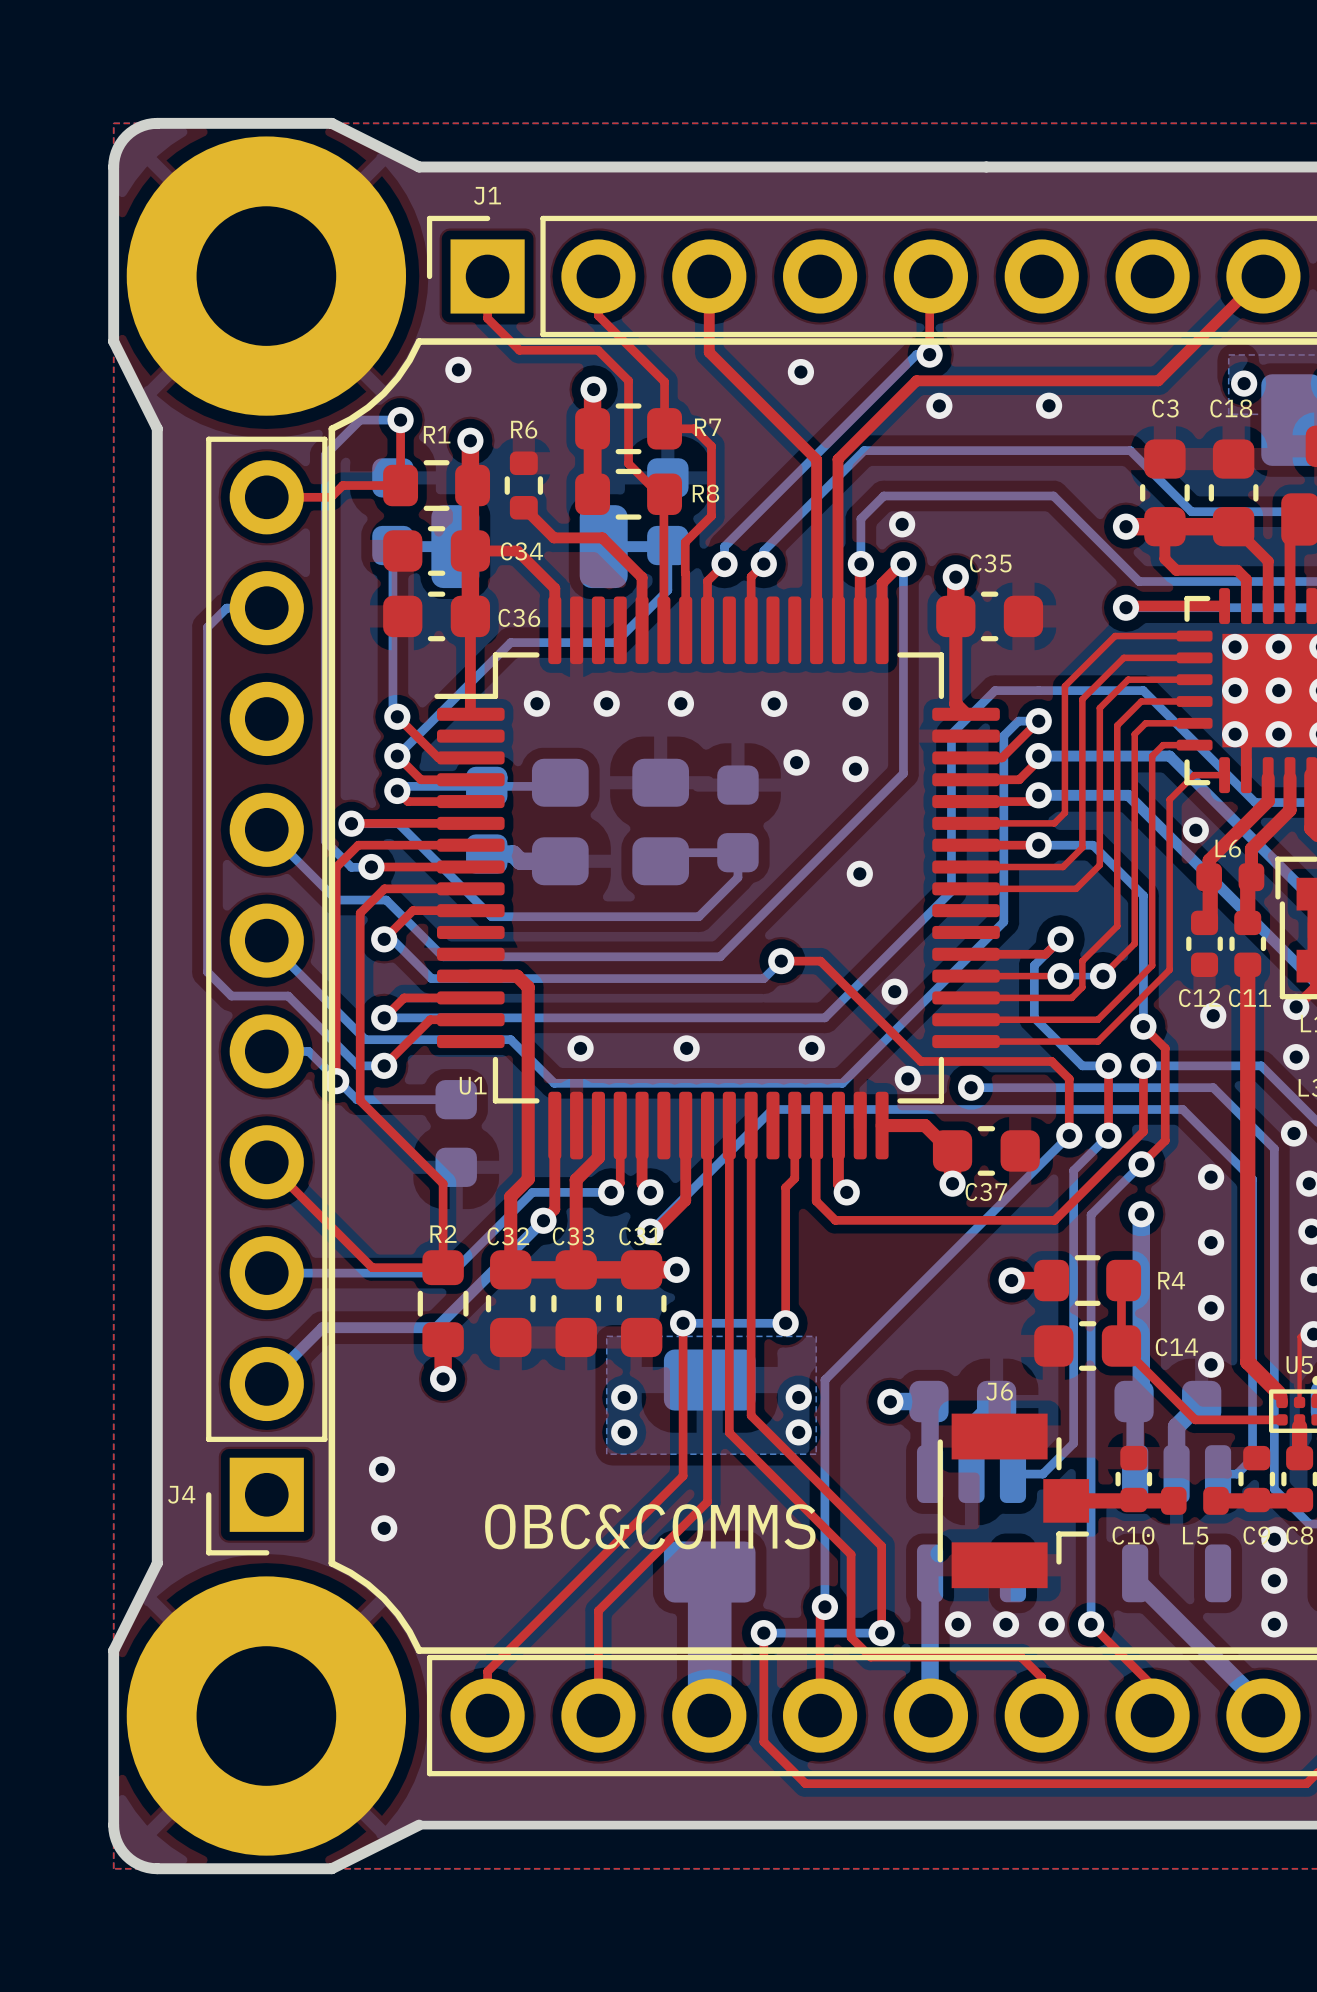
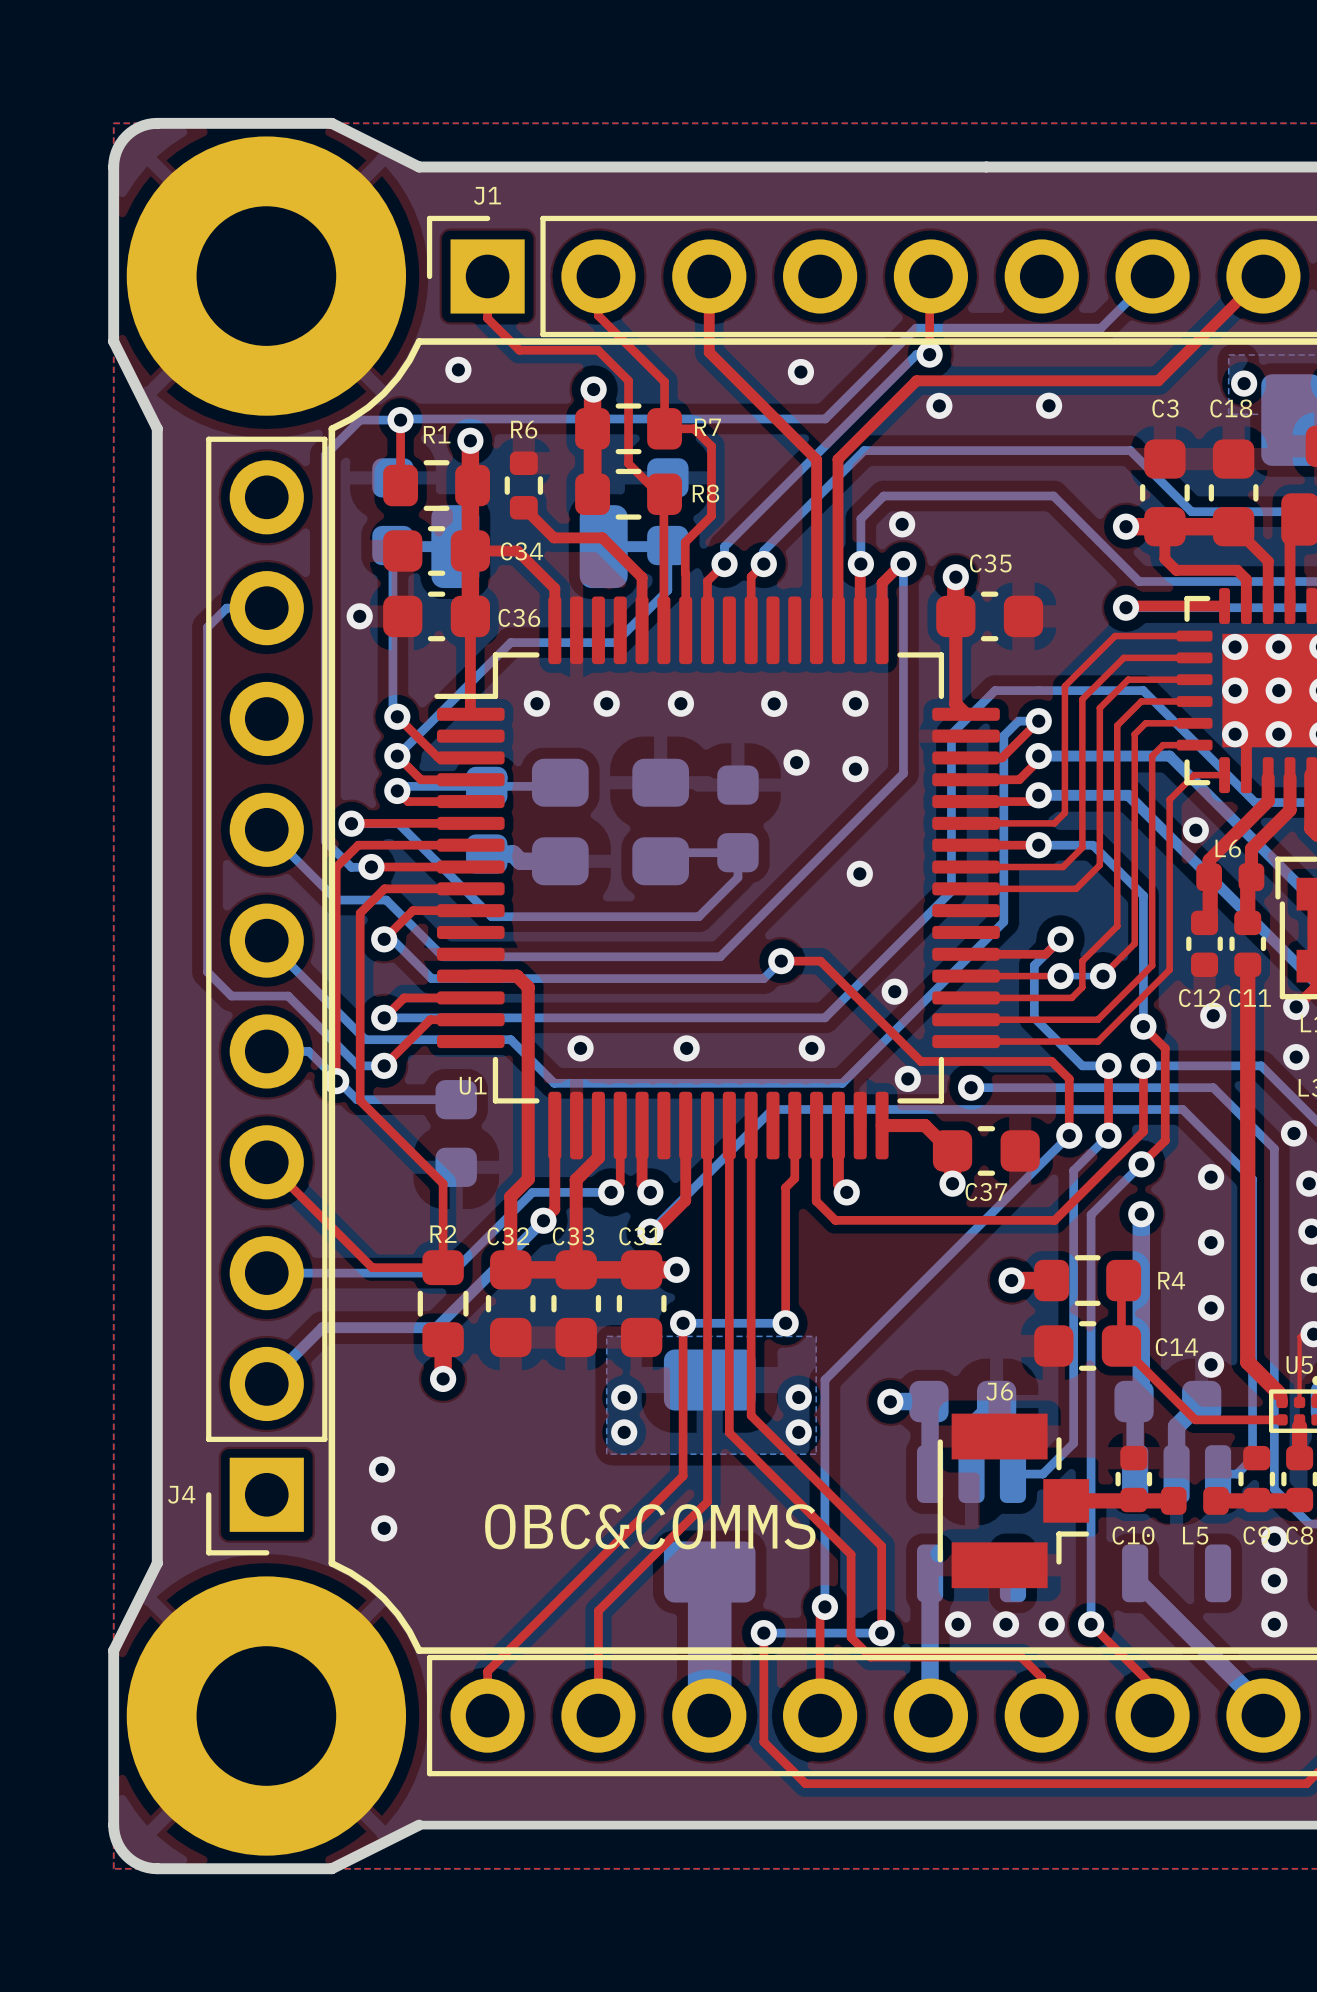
bottom track: none -> (1152, 276) (1100, 328) (916, 328) (825, 418) (400, 420)
top track: (400, 485) (342, 485) (330, 497) (266, 497) -> none
via: none -> (359, 616)

